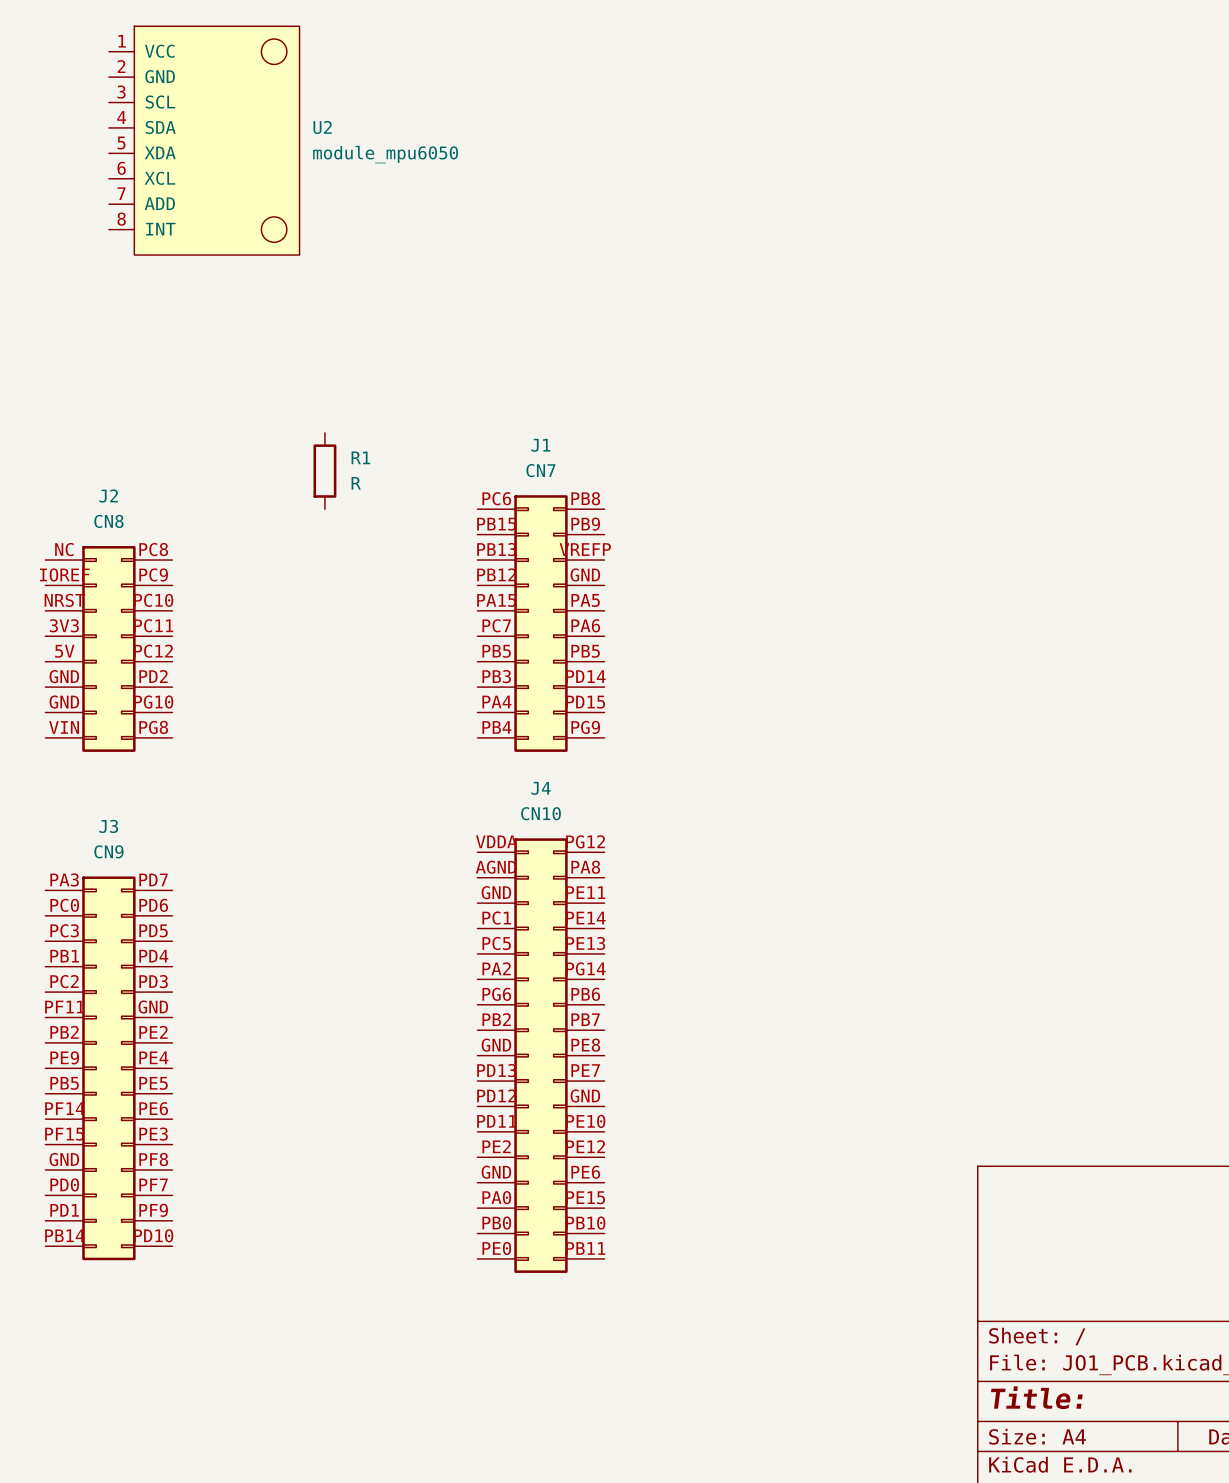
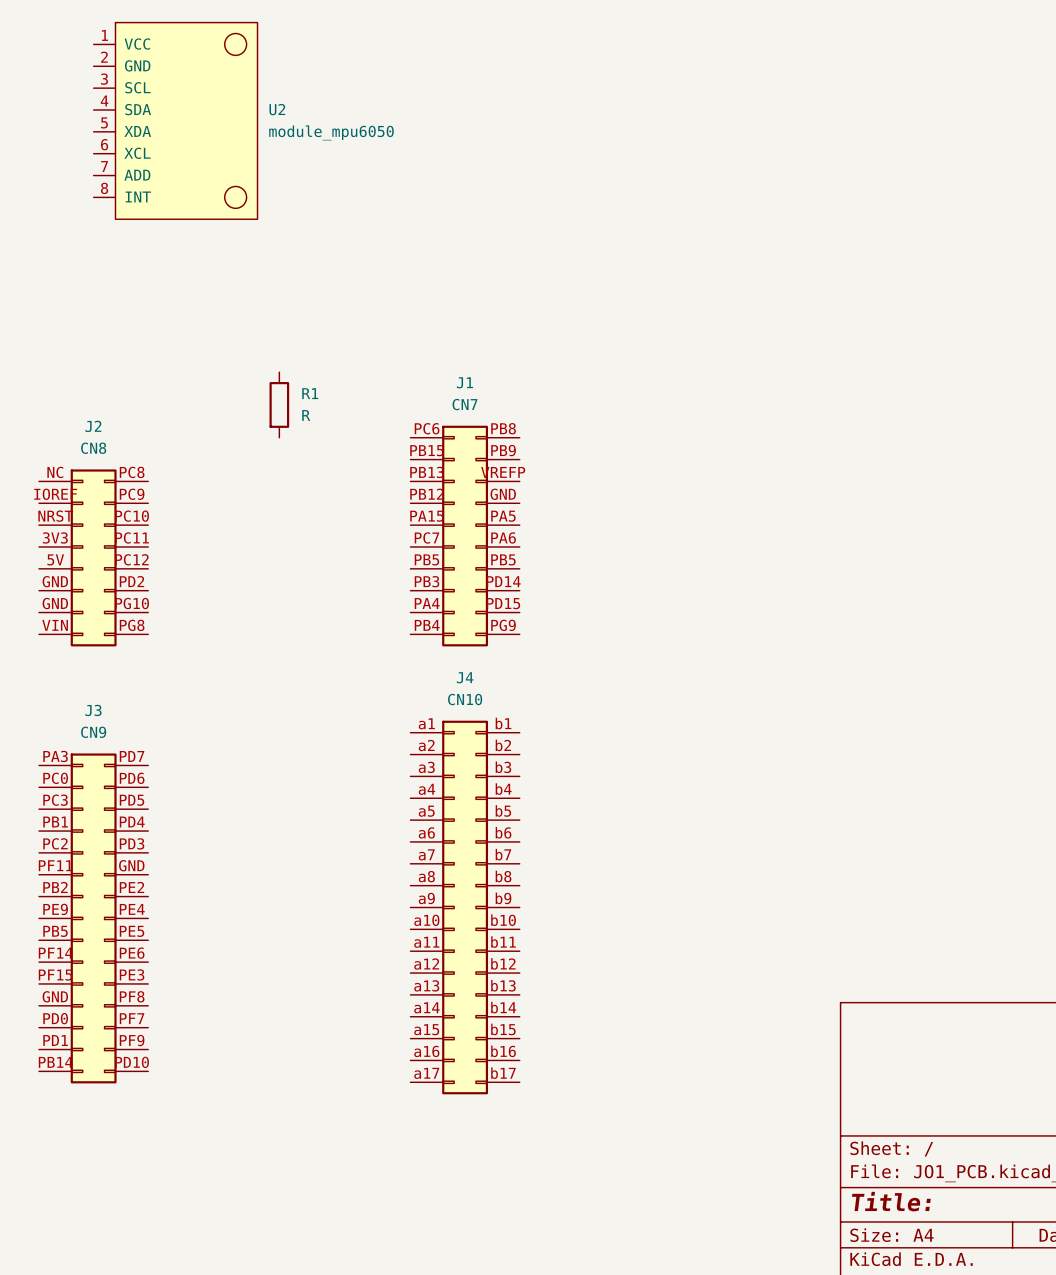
J4 symbol: [477, 838, 605, 1273] -> [410, 720, 520, 1095]

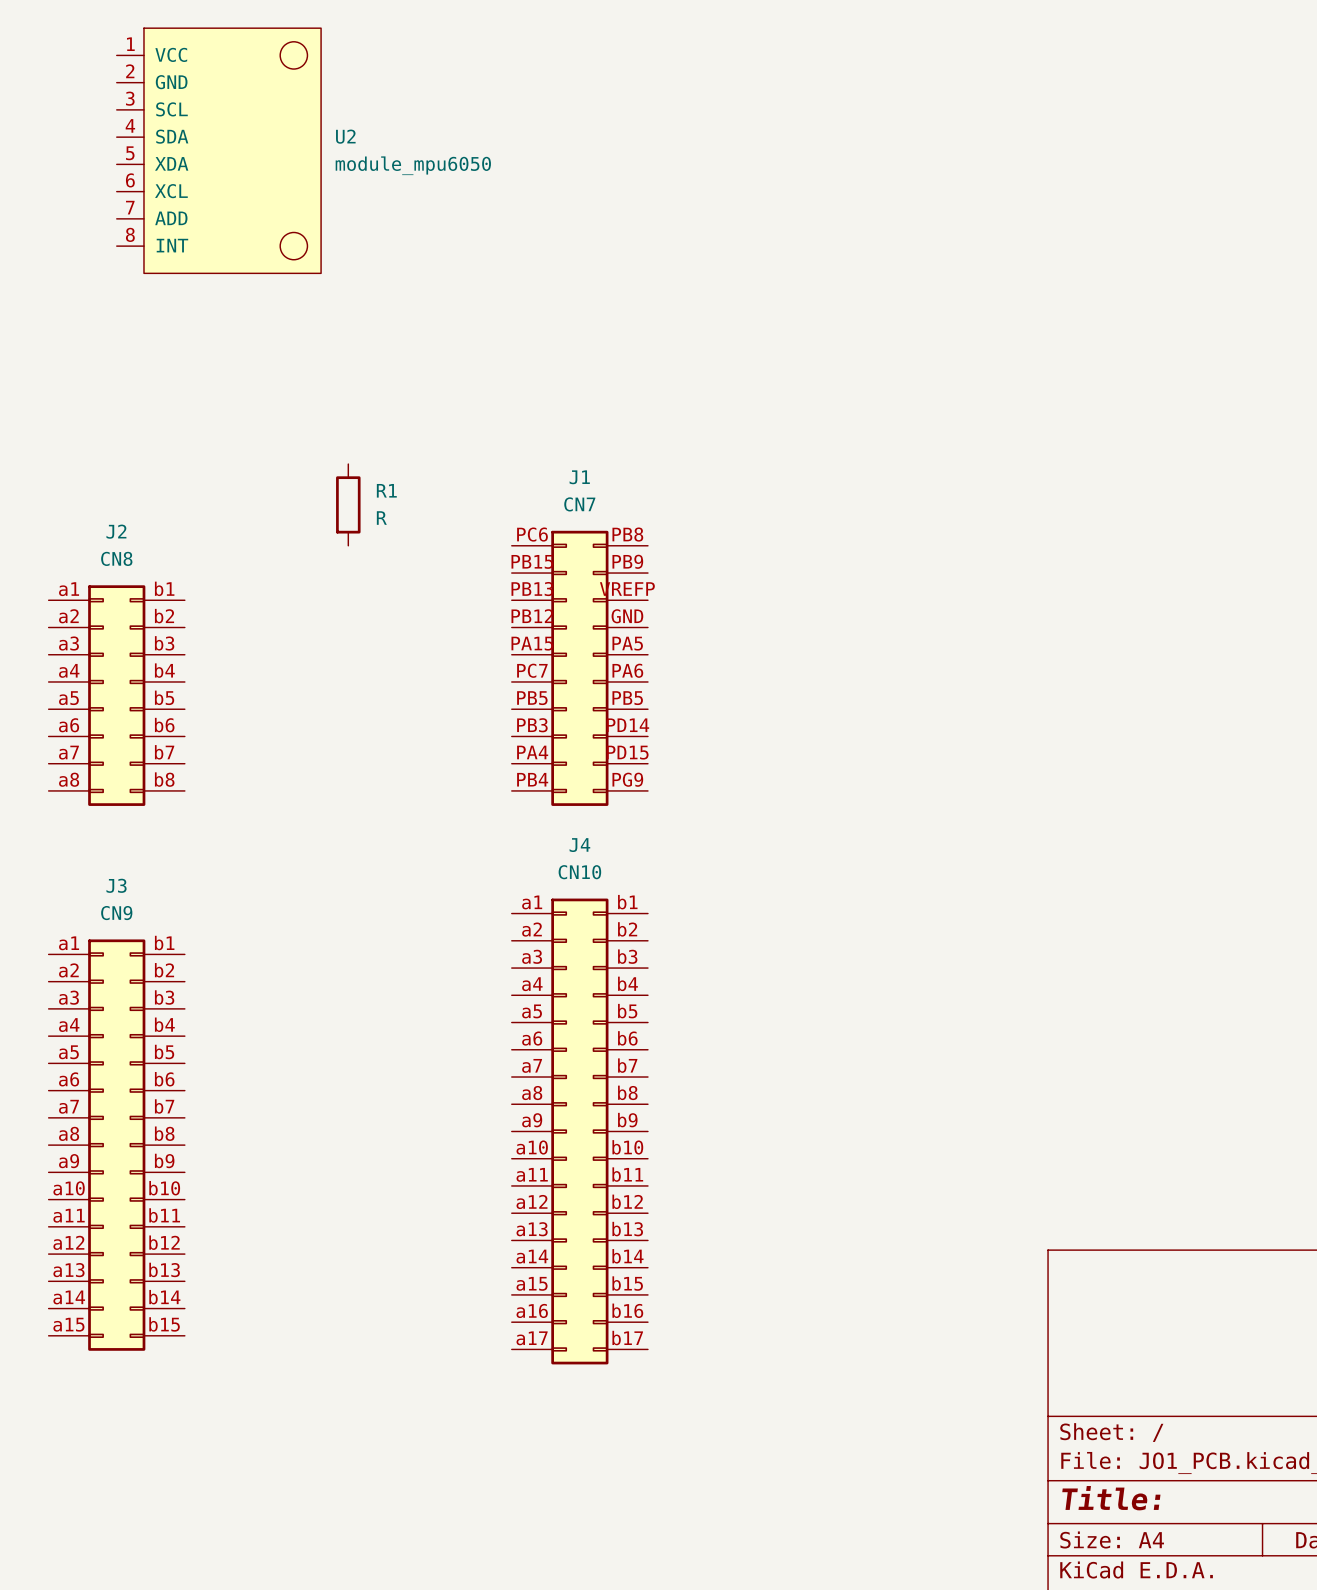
J2 symbol: [39, 469, 149, 647] -> [48, 585, 185, 806]
J3 symbol: [39, 753, 149, 1084] -> [48, 939, 185, 1351]

